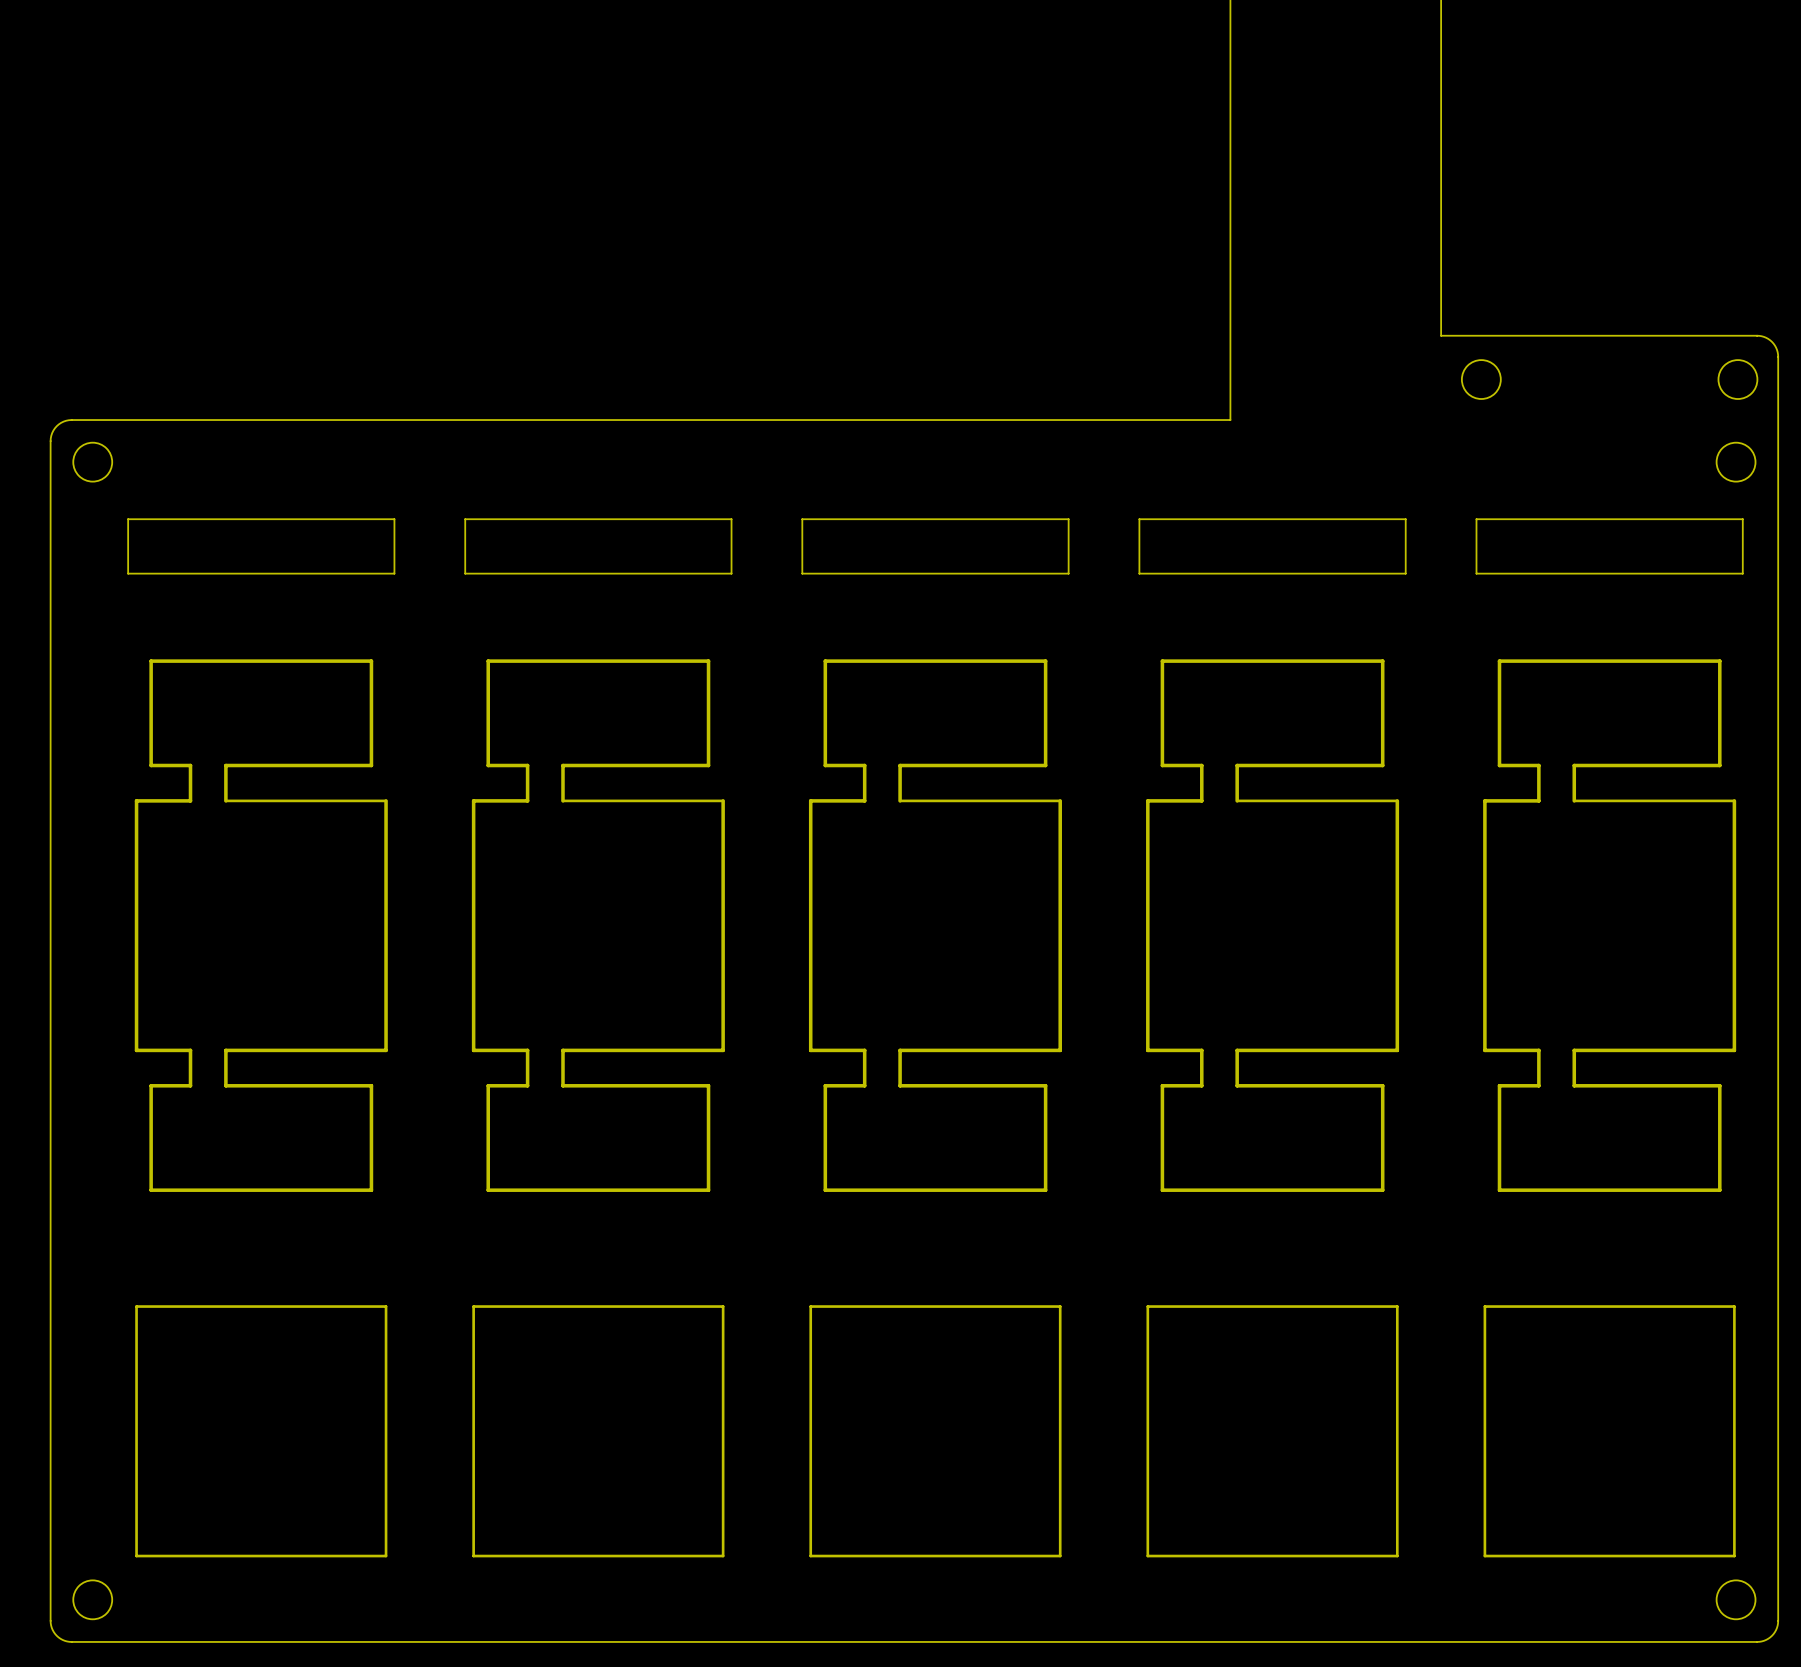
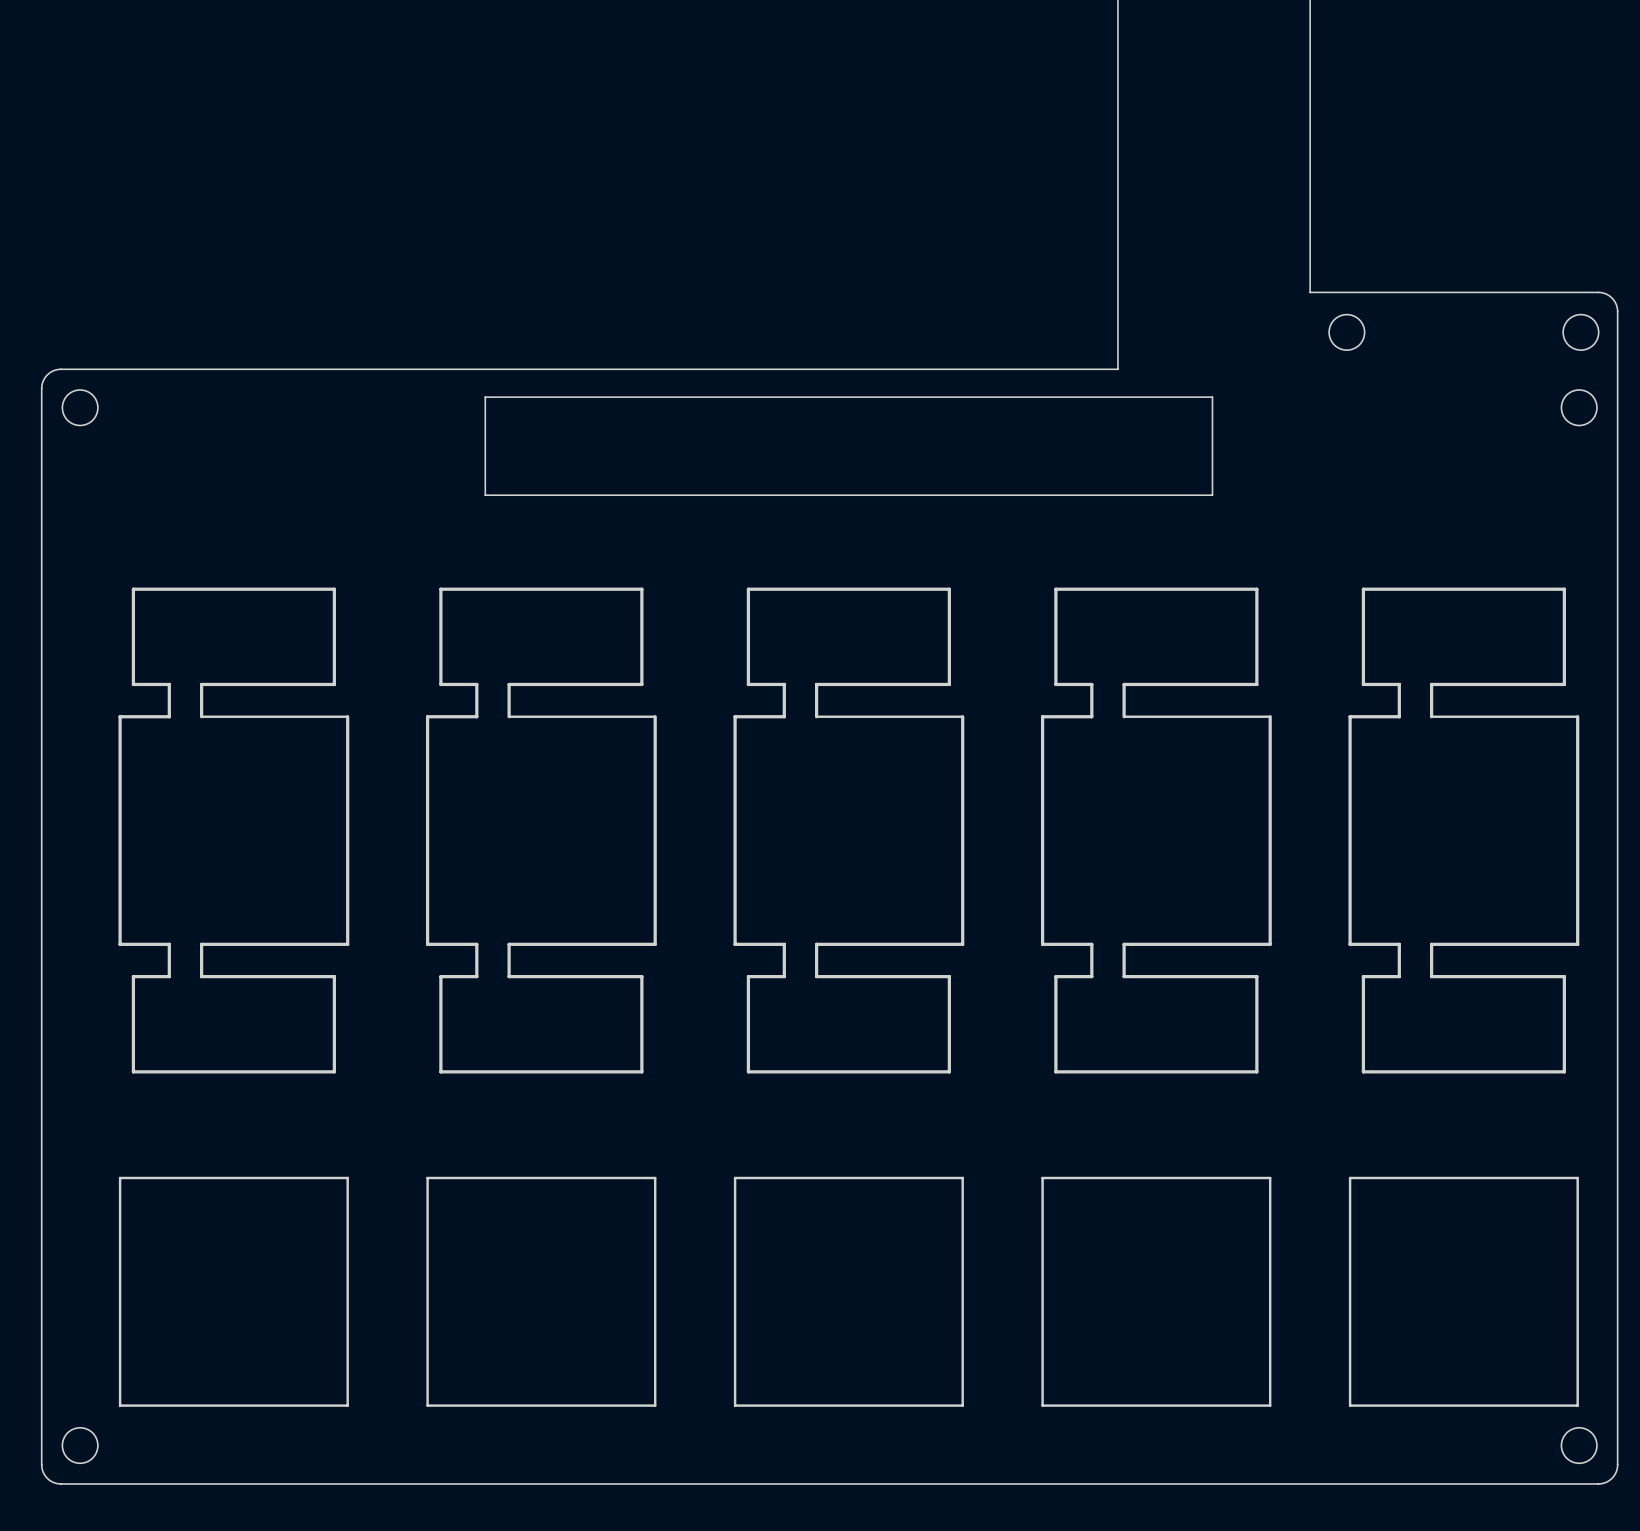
drawing: none -> [484, 396, 1213, 496]
drawing: [127, 518, 395, 575] -> none
drawing: [464, 518, 732, 575] -> none
drawing: [801, 518, 1070, 575] -> none
drawing: [1138, 518, 1407, 575] -> none
drawing: [1476, 518, 1744, 575] -> none

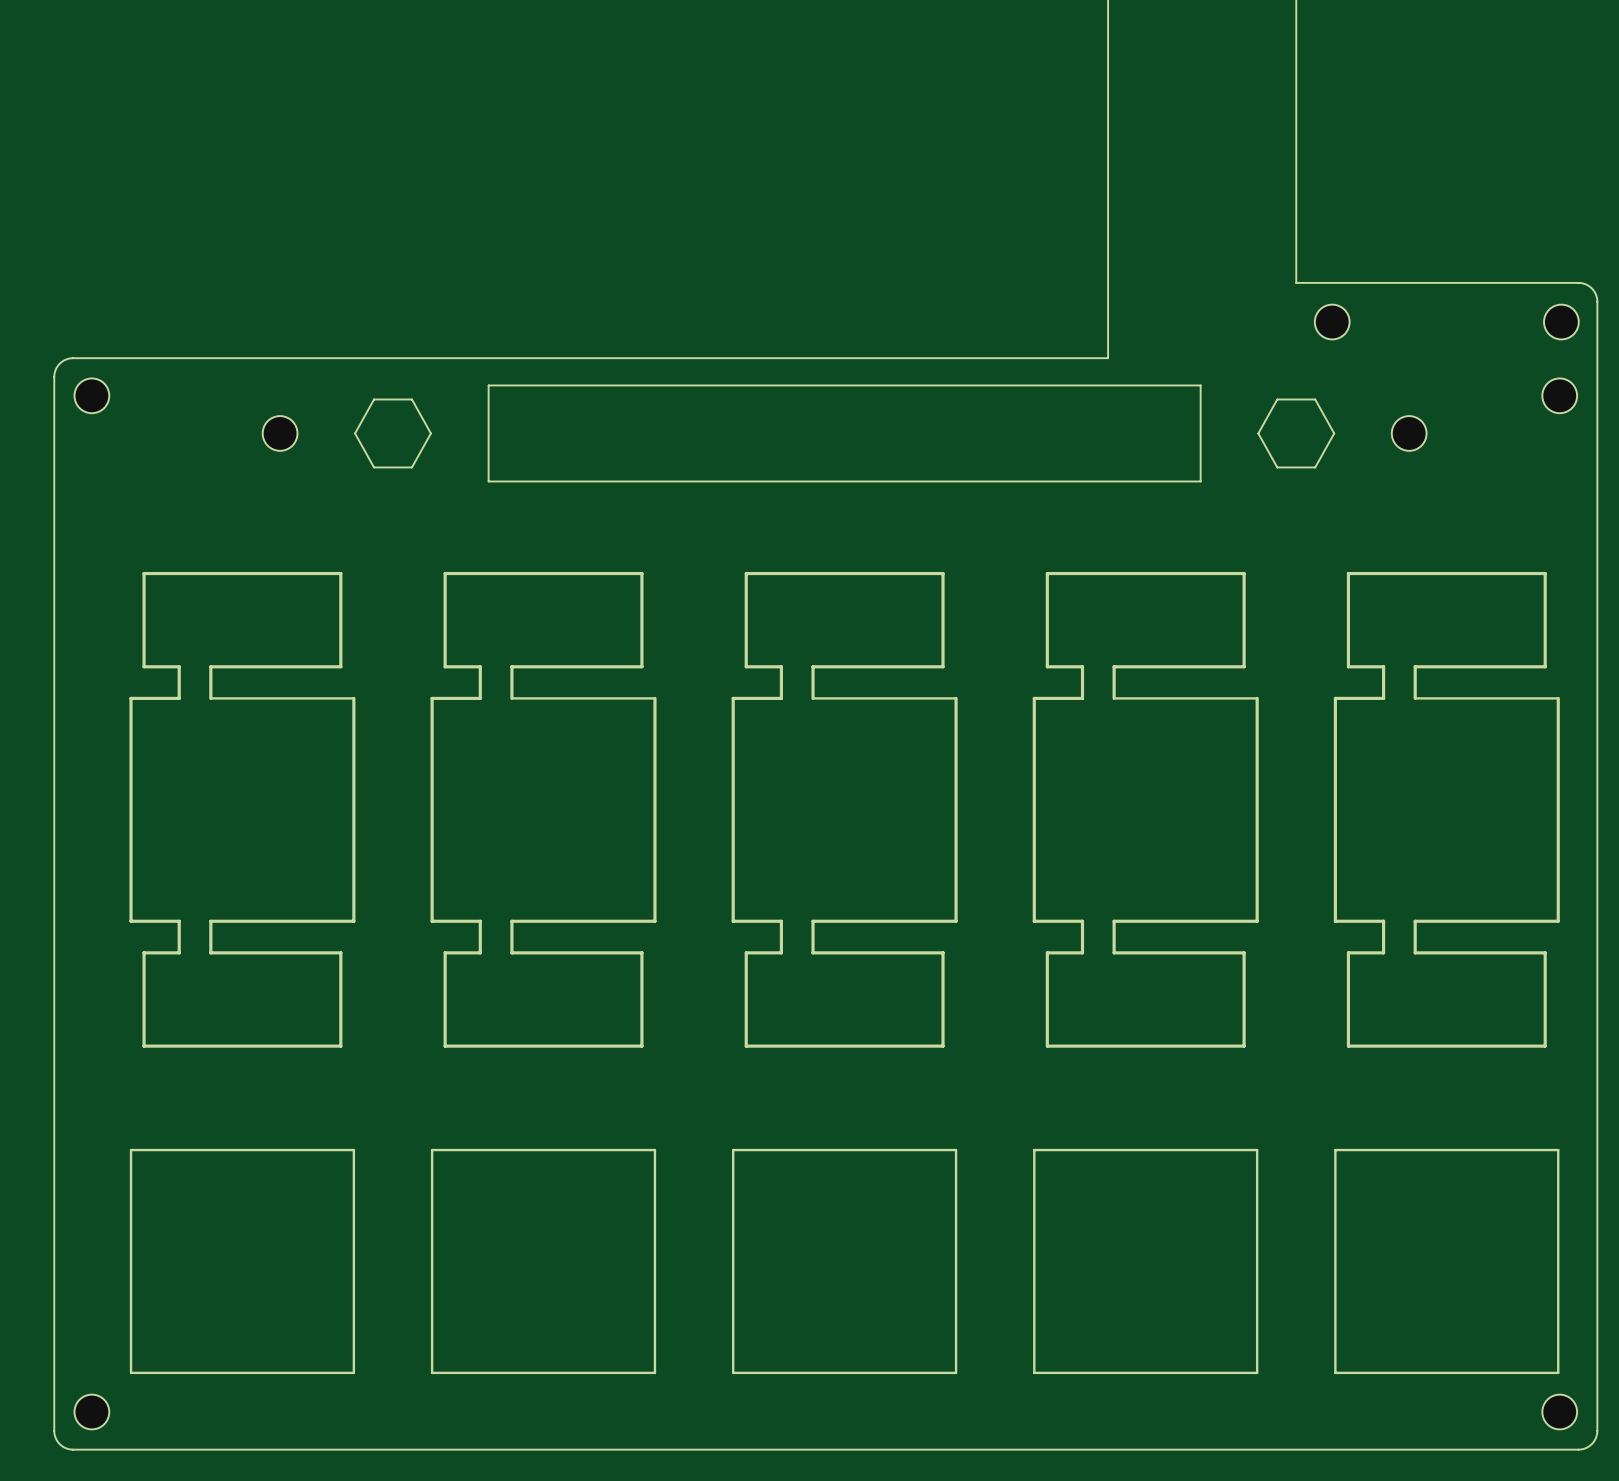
drawing: none -> [354, 398, 432, 469]
drawing: none -> [1257, 398, 1335, 469]
part: none -> (280, 433)
part: none -> (1409, 433)

